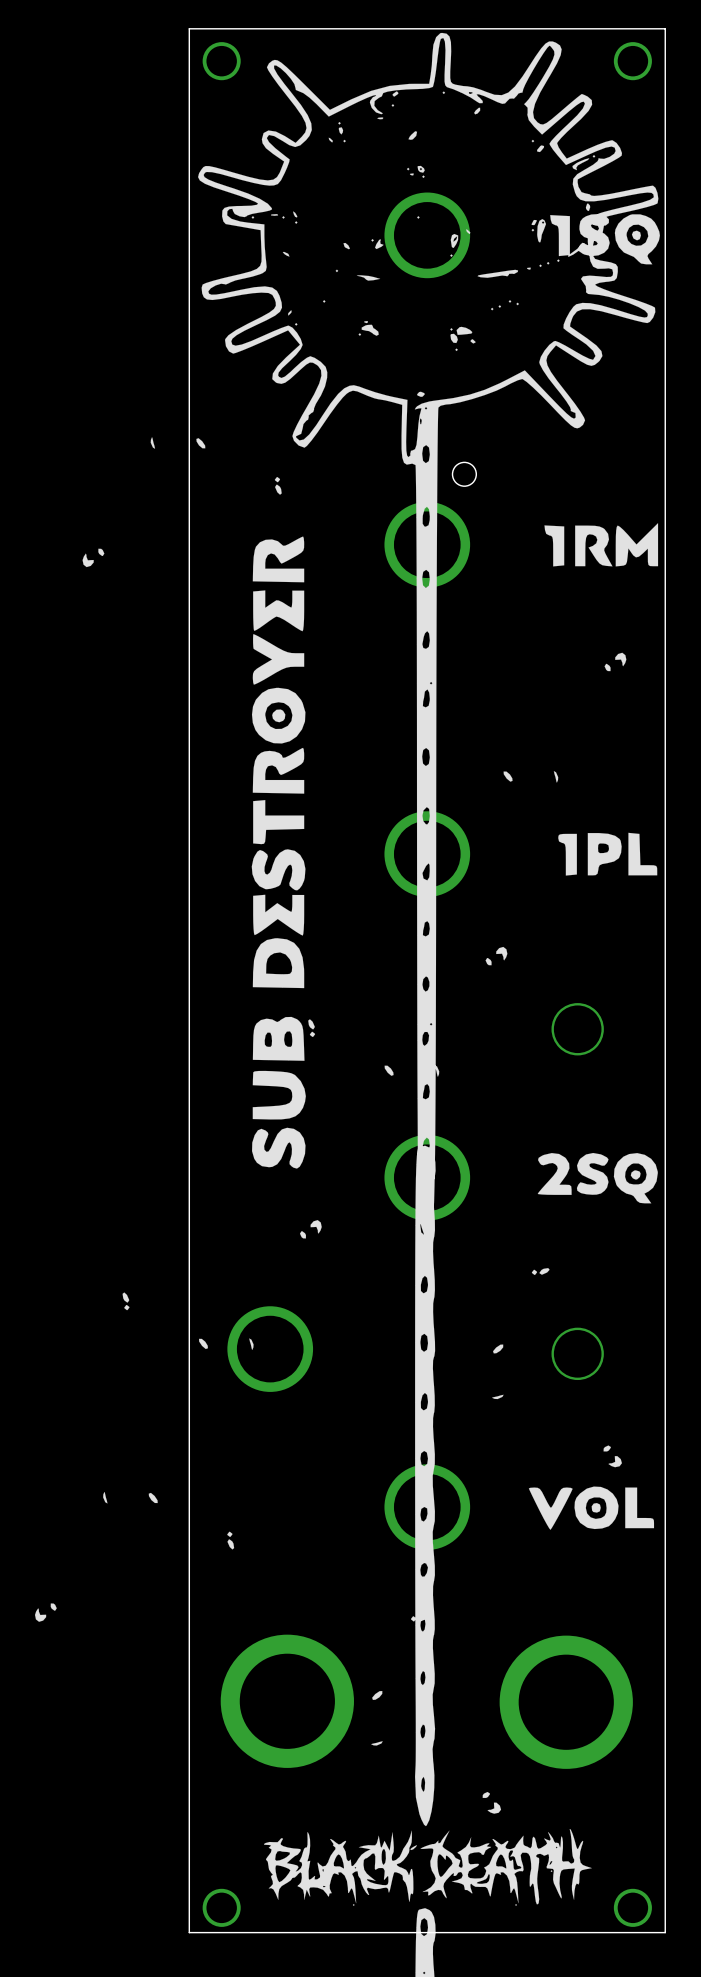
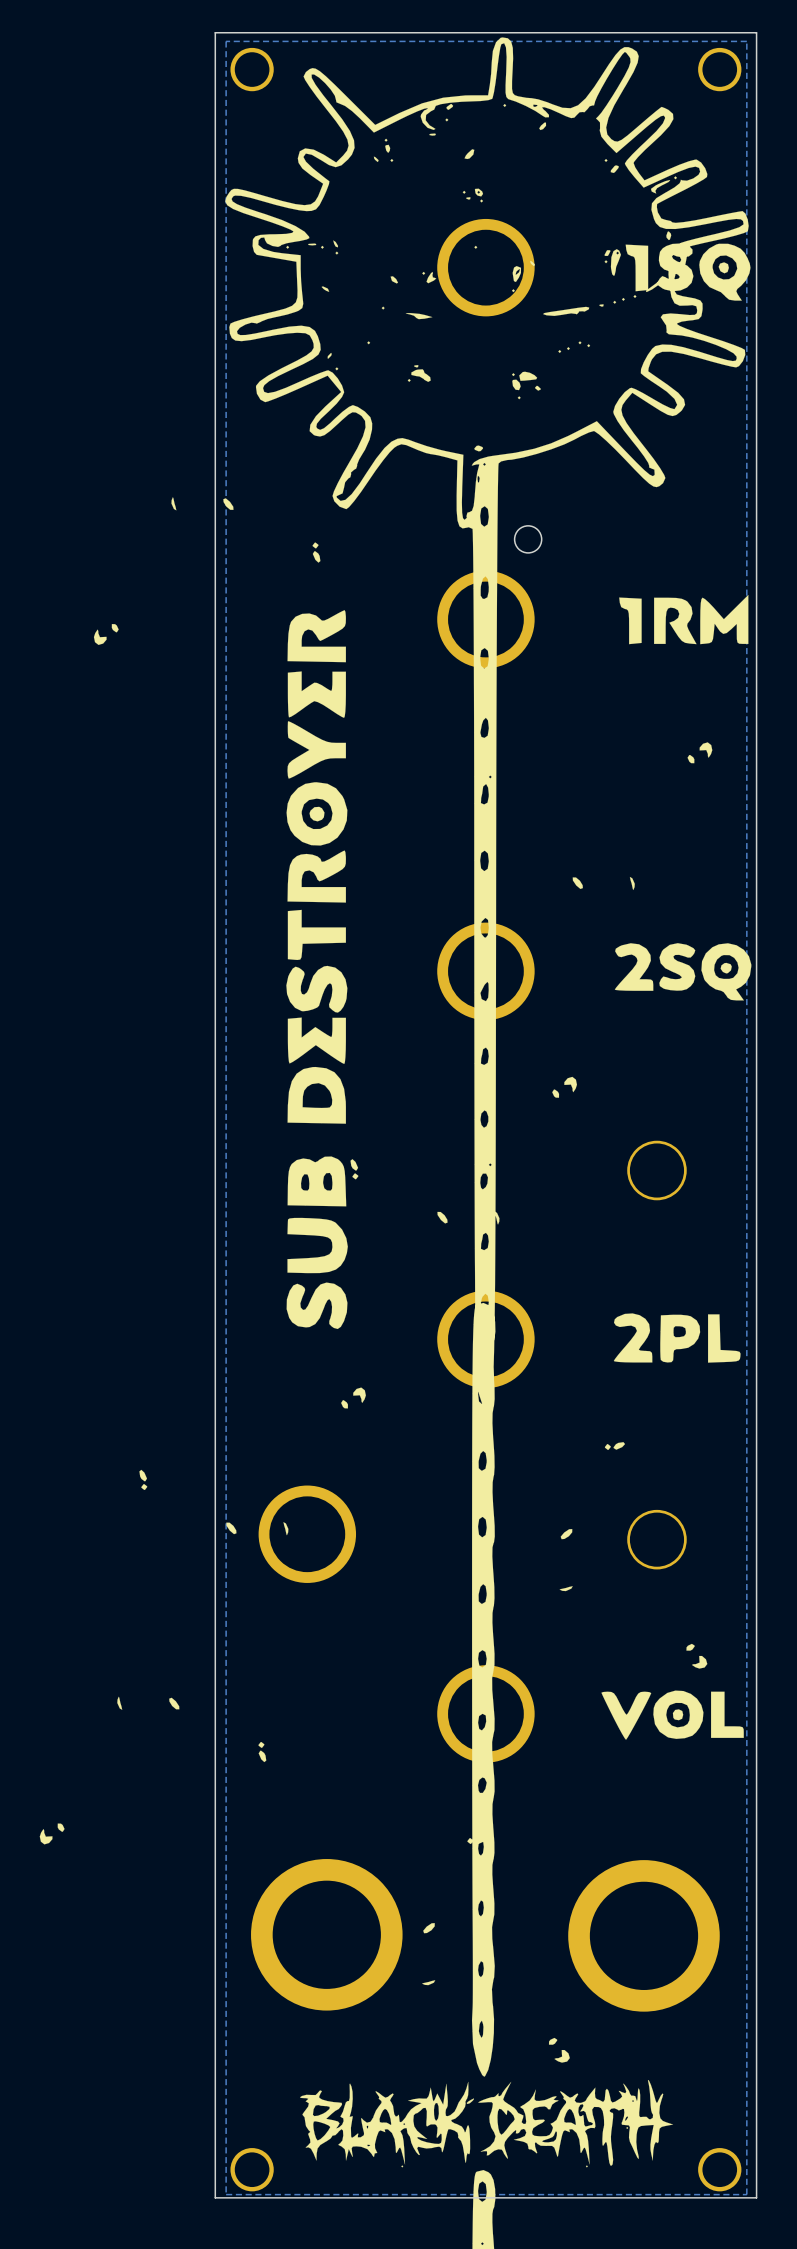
zone outline: none -> (746, 41) (746, 2194) (226, 2194) (226, 41) (746, 41)
drawing shape: [558, 832, 658, 876] -> [614, 943, 752, 1001]
drawing shape: [537, 1152, 658, 1204] -> [613, 1313, 741, 1363]

